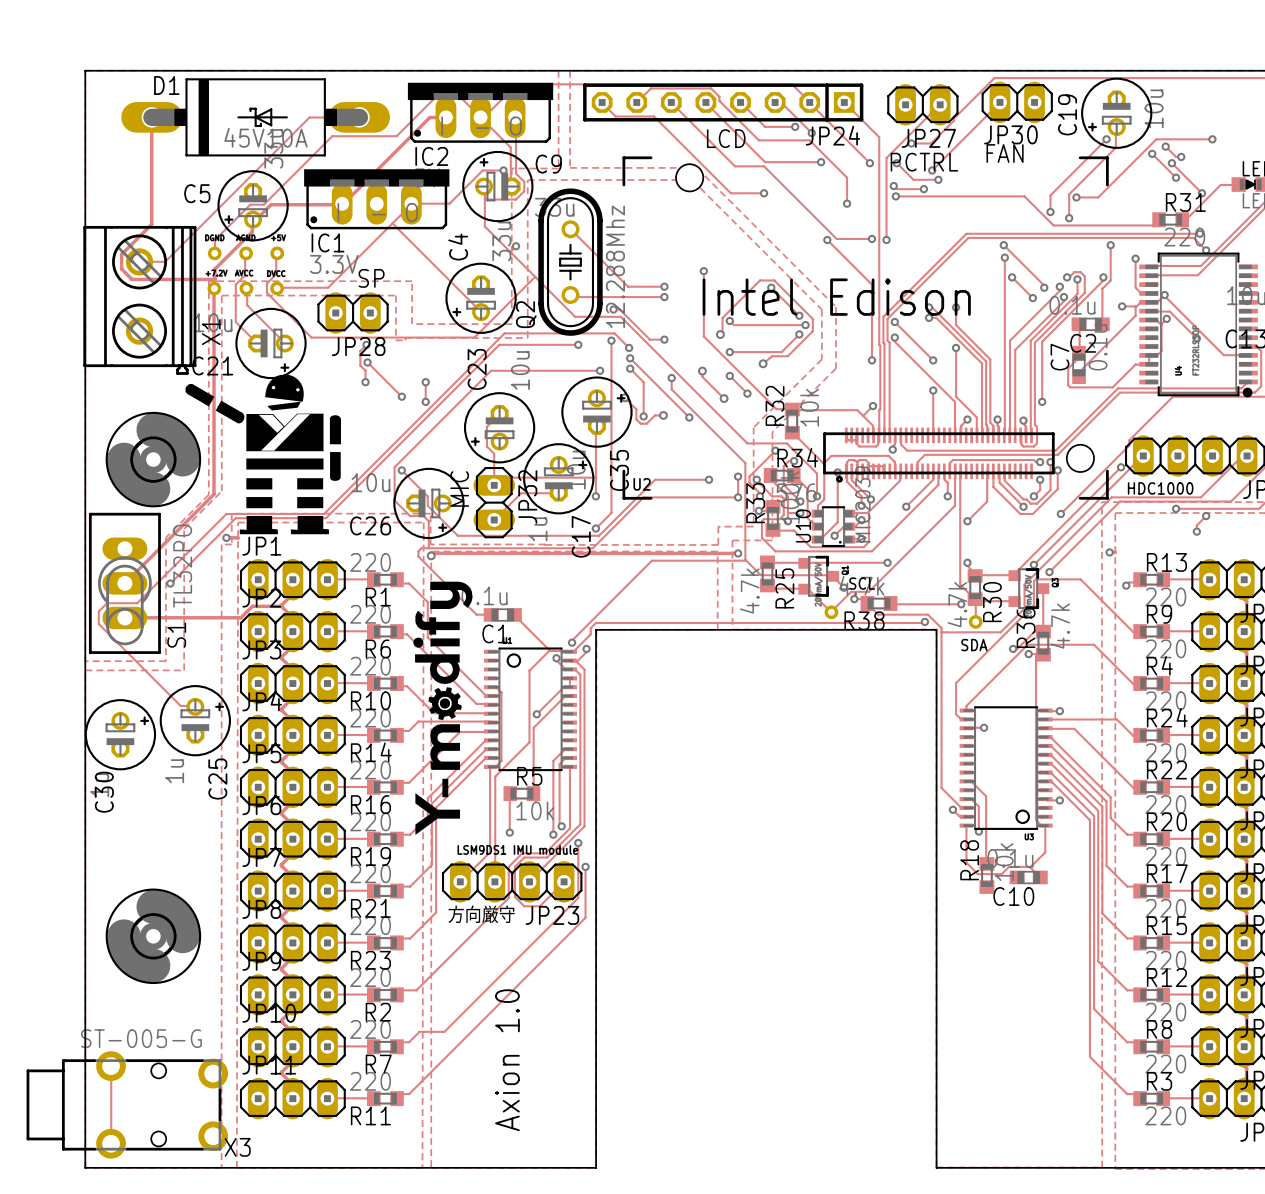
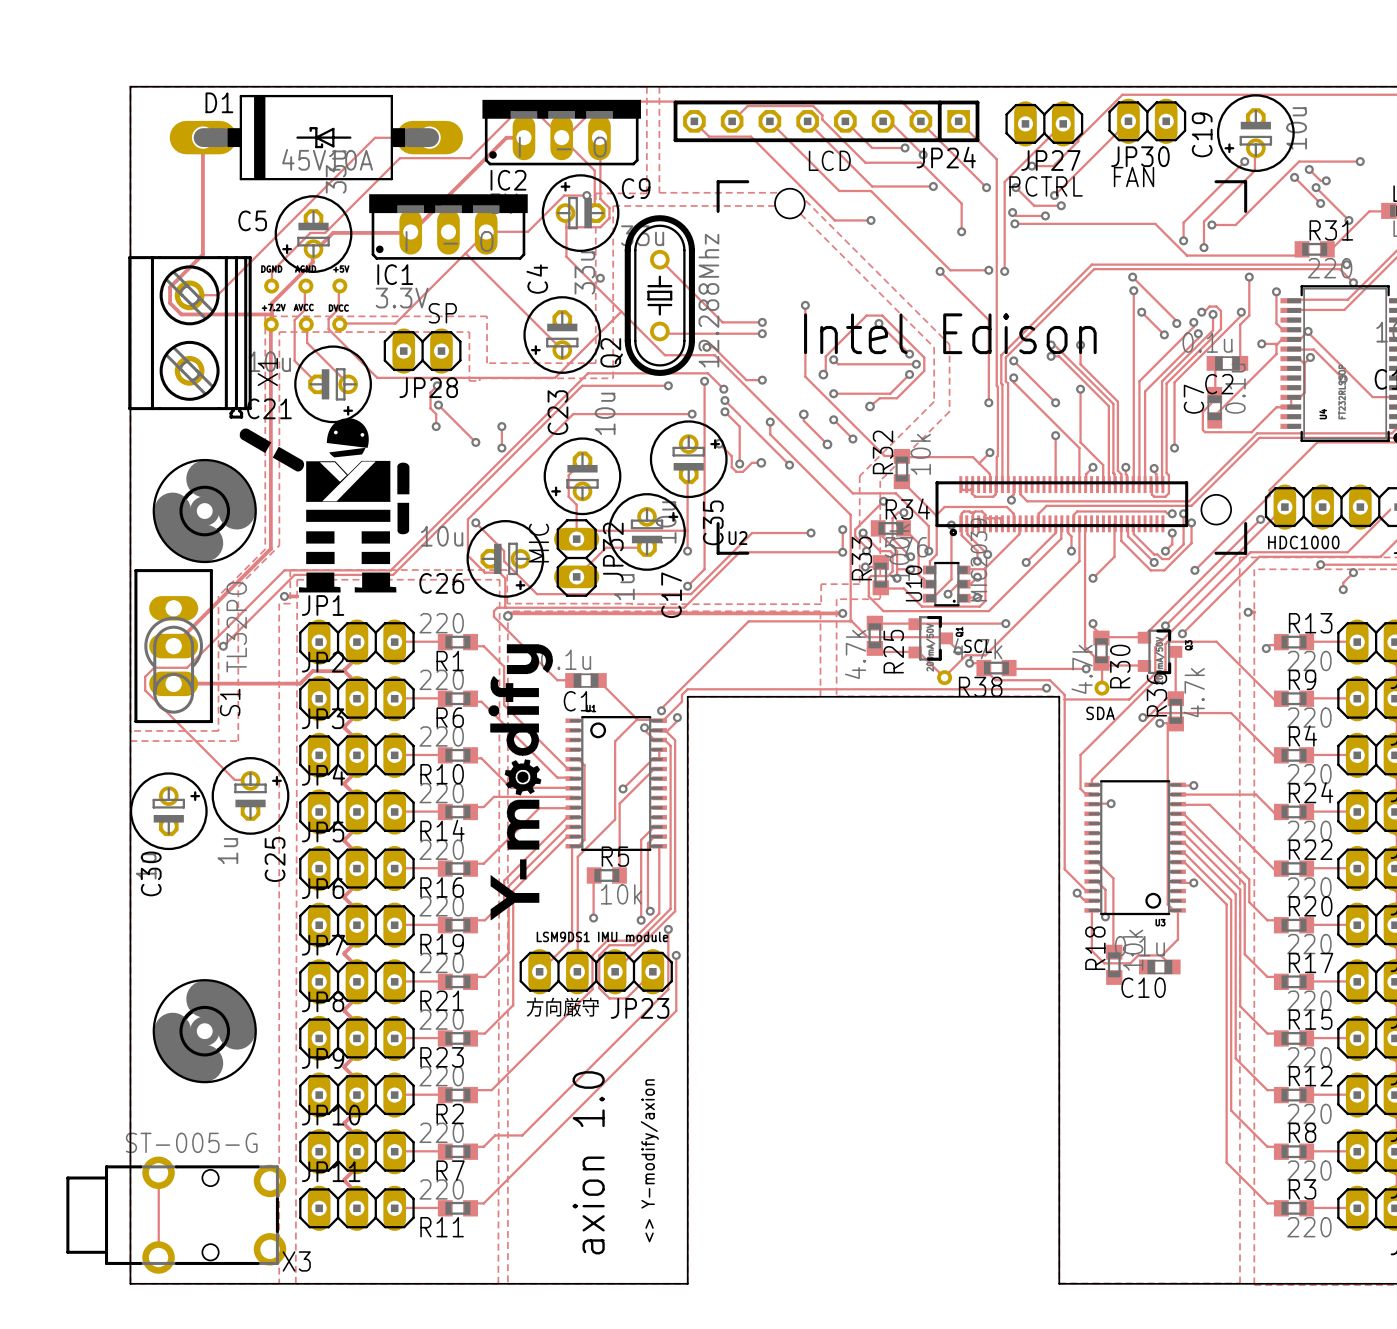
text: none -> <> Y-modify/axion (649, 1160)
text: Axion 1.0 (507, 1060) -> axion 1.0 (588, 1162)

